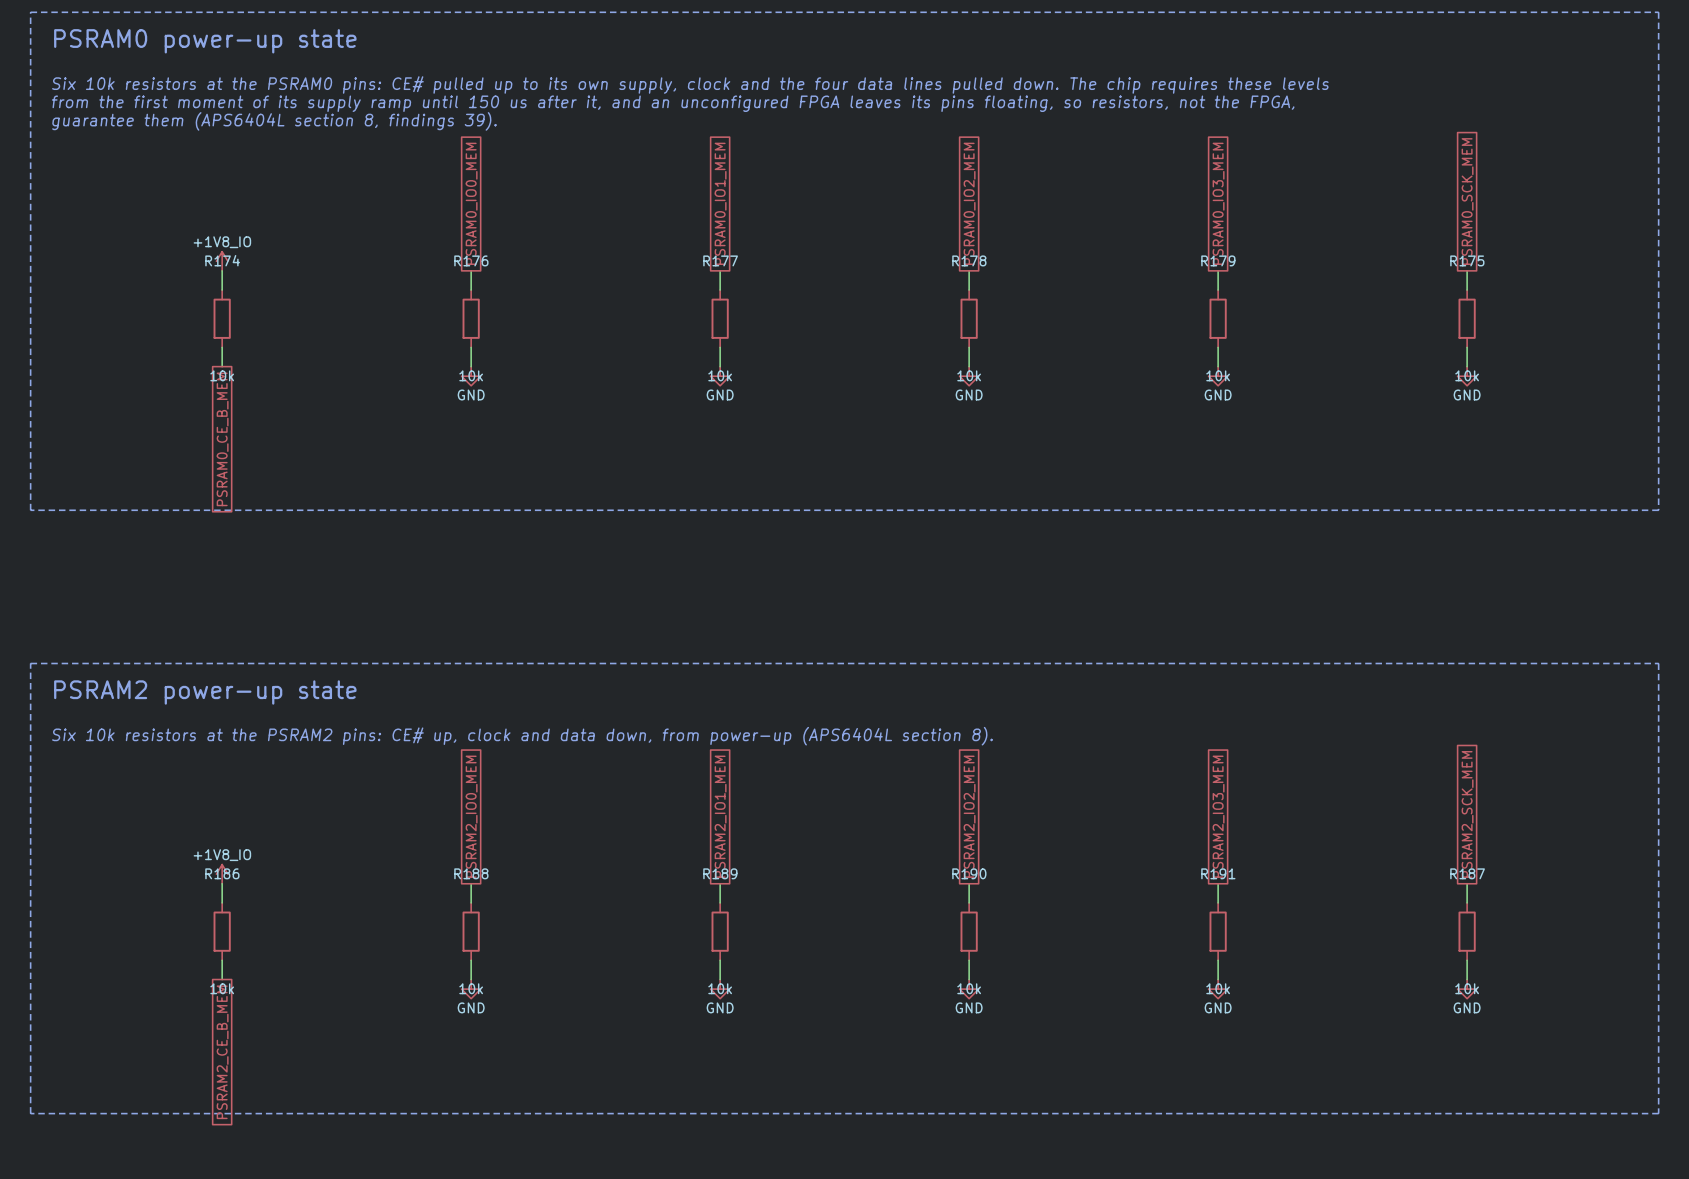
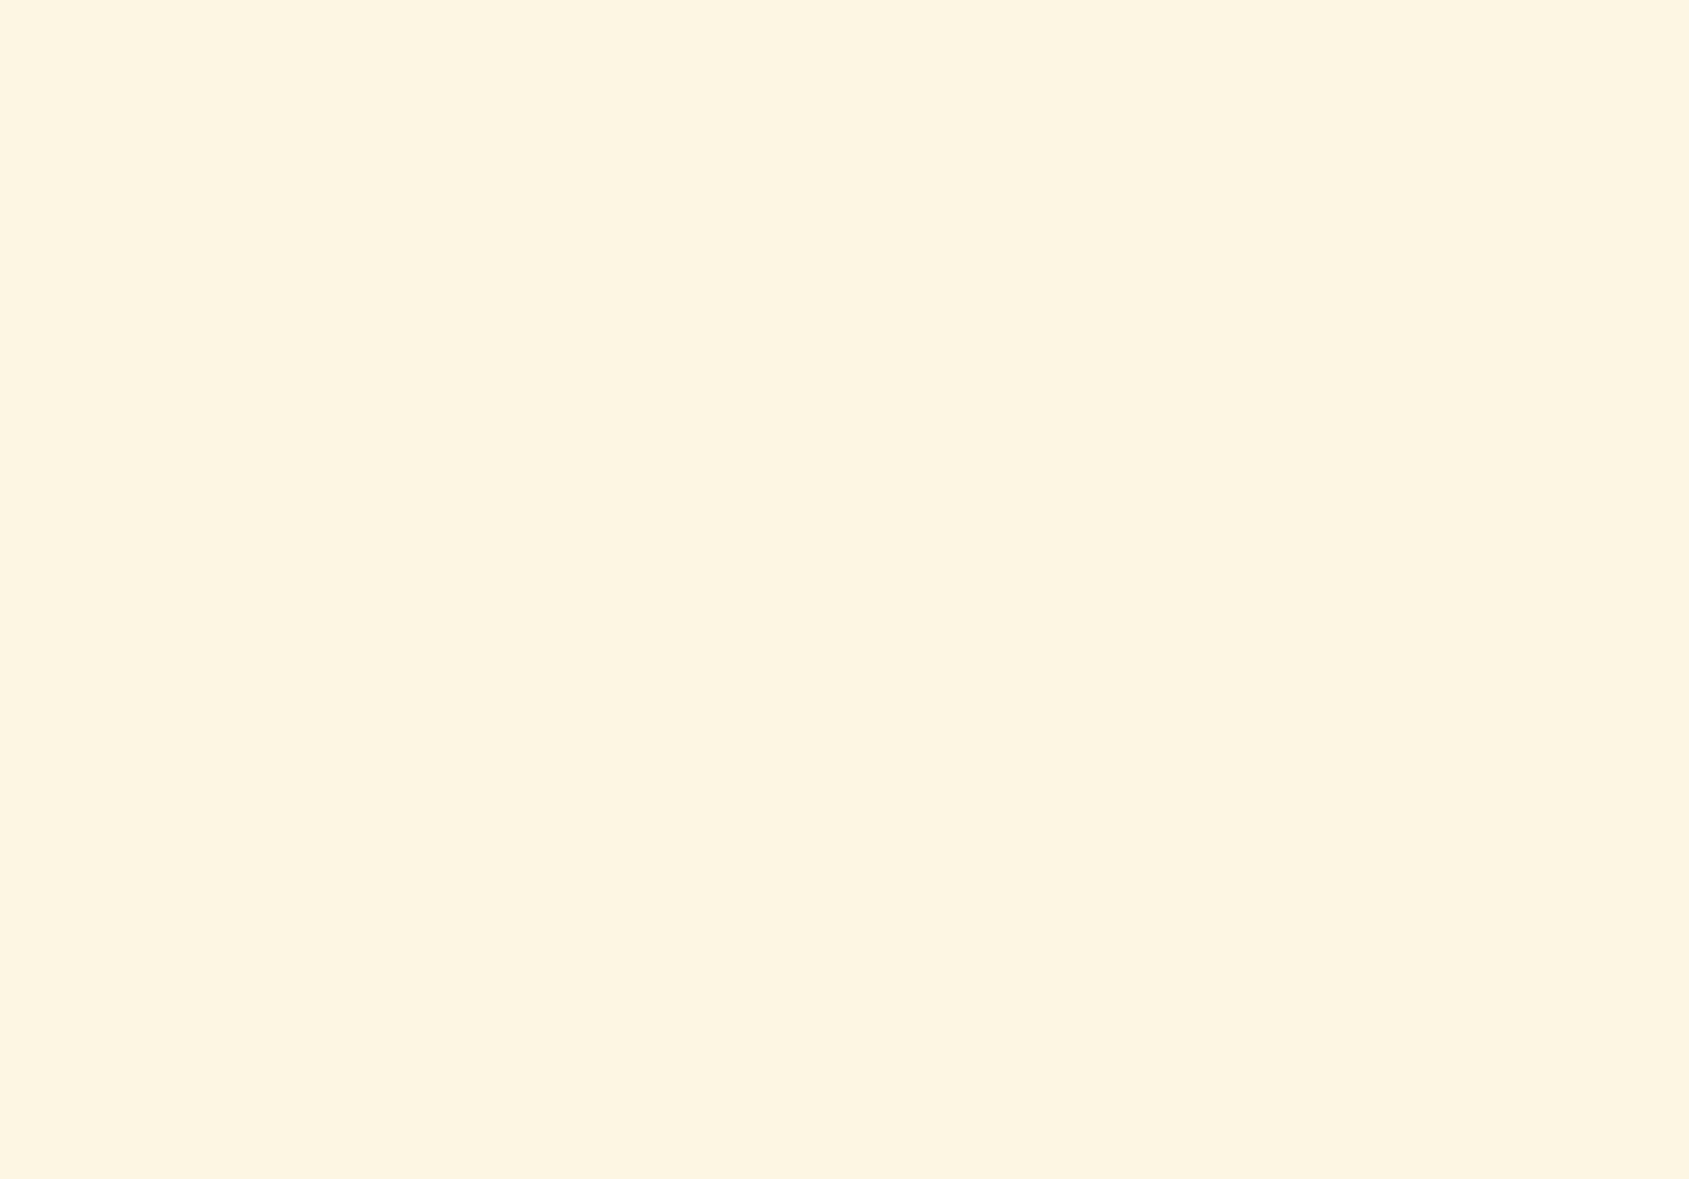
line: (30, 12) (1658, 12) (1658, 510) (30, 510) (30, 12) -> none
text: PSRAM0 power-up state (205, 41) -> none
text: Six 10k resistors at the PSRAM0 pins: CE# pulled up to its own supply, clock and the four data lines pulled down. The chip requires these levels (690, 84) -> none
text: from the first moment of its supply ramp until 150 us after it, and an unconfigured FPGA leaves its pins floating, so resistors, not the FPGA, (673, 103) -> none
text: guarantee them (APS6404L section 8, findings 39). (274, 121) -> none
global label: PSRAM0_SCK_MEM (1467, 201) -> none
global label: PSRAM0_IO0_MEM (471, 203) -> none
global label: PSRAM0_IO1_MEM (720, 203) -> none
global label: PSRAM0_IO2_MEM (969, 203) -> none
global label: PSRAM0_IO3_MEM (1218, 203) -> none
power symbol: +1V8_IO (222, 261) -> none
wire: (222, 270) (222, 290) -> none
wire: (471, 270) (471, 290) -> none
wire: (720, 270) (720, 290) -> none
wire: (969, 270) (969, 290) -> none
wire: (1218, 270) (1218, 290) -> none
wire: (1467, 270) (1467, 290) -> none
R174: 10k (222, 318) -> none
R176: 10k (471, 318) -> none
R177: 10k (720, 318) -> none
R178: 10k (969, 318) -> none
R179: 10k (1218, 318) -> none
R175: 10k (1467, 318) -> none
wire: (222, 347) (222, 366) -> none
wire: (471, 347) (471, 366) -> none
wire: (720, 347) (720, 366) -> none
wire: (969, 347) (969, 366) -> none
wire: (1218, 347) (1218, 366) -> none
wire: (1467, 347) (1467, 366) -> none
power symbol: GND (471, 376) -> none
power symbol: GND (720, 376) -> none
power symbol: GND (969, 376) -> none
power symbol: GND (1218, 376) -> none
power symbol: GND (1467, 376) -> none
global label: PSRAM0_CE_B_MEM (222, 439) -> none
line: (30, 663) (30, 1113) (1658, 1113) (1658, 663) (30, 663) -> none
text: PSRAM2 power-up state (205, 692) -> none
text: Six 10k resistors at the PSRAM2 pins: CE# up, clock and data down, from power-up (APS6404L section 8). (522, 736) -> none
global label: PSRAM2_SCK_MEM (1467, 814) -> none
global label: PSRAM2_IO0_MEM (471, 816) -> none
global label: PSRAM2_IO1_MEM (720, 816) -> none
global label: PSRAM2_IO2_MEM (969, 816) -> none
global label: PSRAM2_IO3_MEM (1218, 816) -> none
power symbol: +1V8_IO (222, 874) -> none
wire: (222, 883) (222, 902) -> none
wire: (471, 883) (471, 902) -> none
wire: (720, 883) (720, 902) -> none
wire: (969, 883) (969, 902) -> none
wire: (1218, 883) (1218, 902) -> none
wire: (1467, 883) (1467, 902) -> none
R186: 10k (222, 931) -> none
R188: 10k (471, 931) -> none
R189: 10k (720, 931) -> none
R190: 10k (969, 931) -> none
R191: 10k (1218, 931) -> none
R187: 10k (1467, 931) -> none
wire: (222, 960) (222, 979) -> none
wire: (471, 960) (471, 979) -> none
wire: (720, 960) (720, 979) -> none
wire: (969, 960) (969, 979) -> none
wire: (1218, 960) (1218, 979) -> none
wire: (1467, 960) (1467, 979) -> none
power symbol: GND (471, 989) -> none
power symbol: GND (720, 989) -> none
power symbol: GND (969, 989) -> none
power symbol: GND (1218, 989) -> none
power symbol: GND (1467, 989) -> none
global label: PSRAM2_CE_B_MEM (222, 1052) -> none

